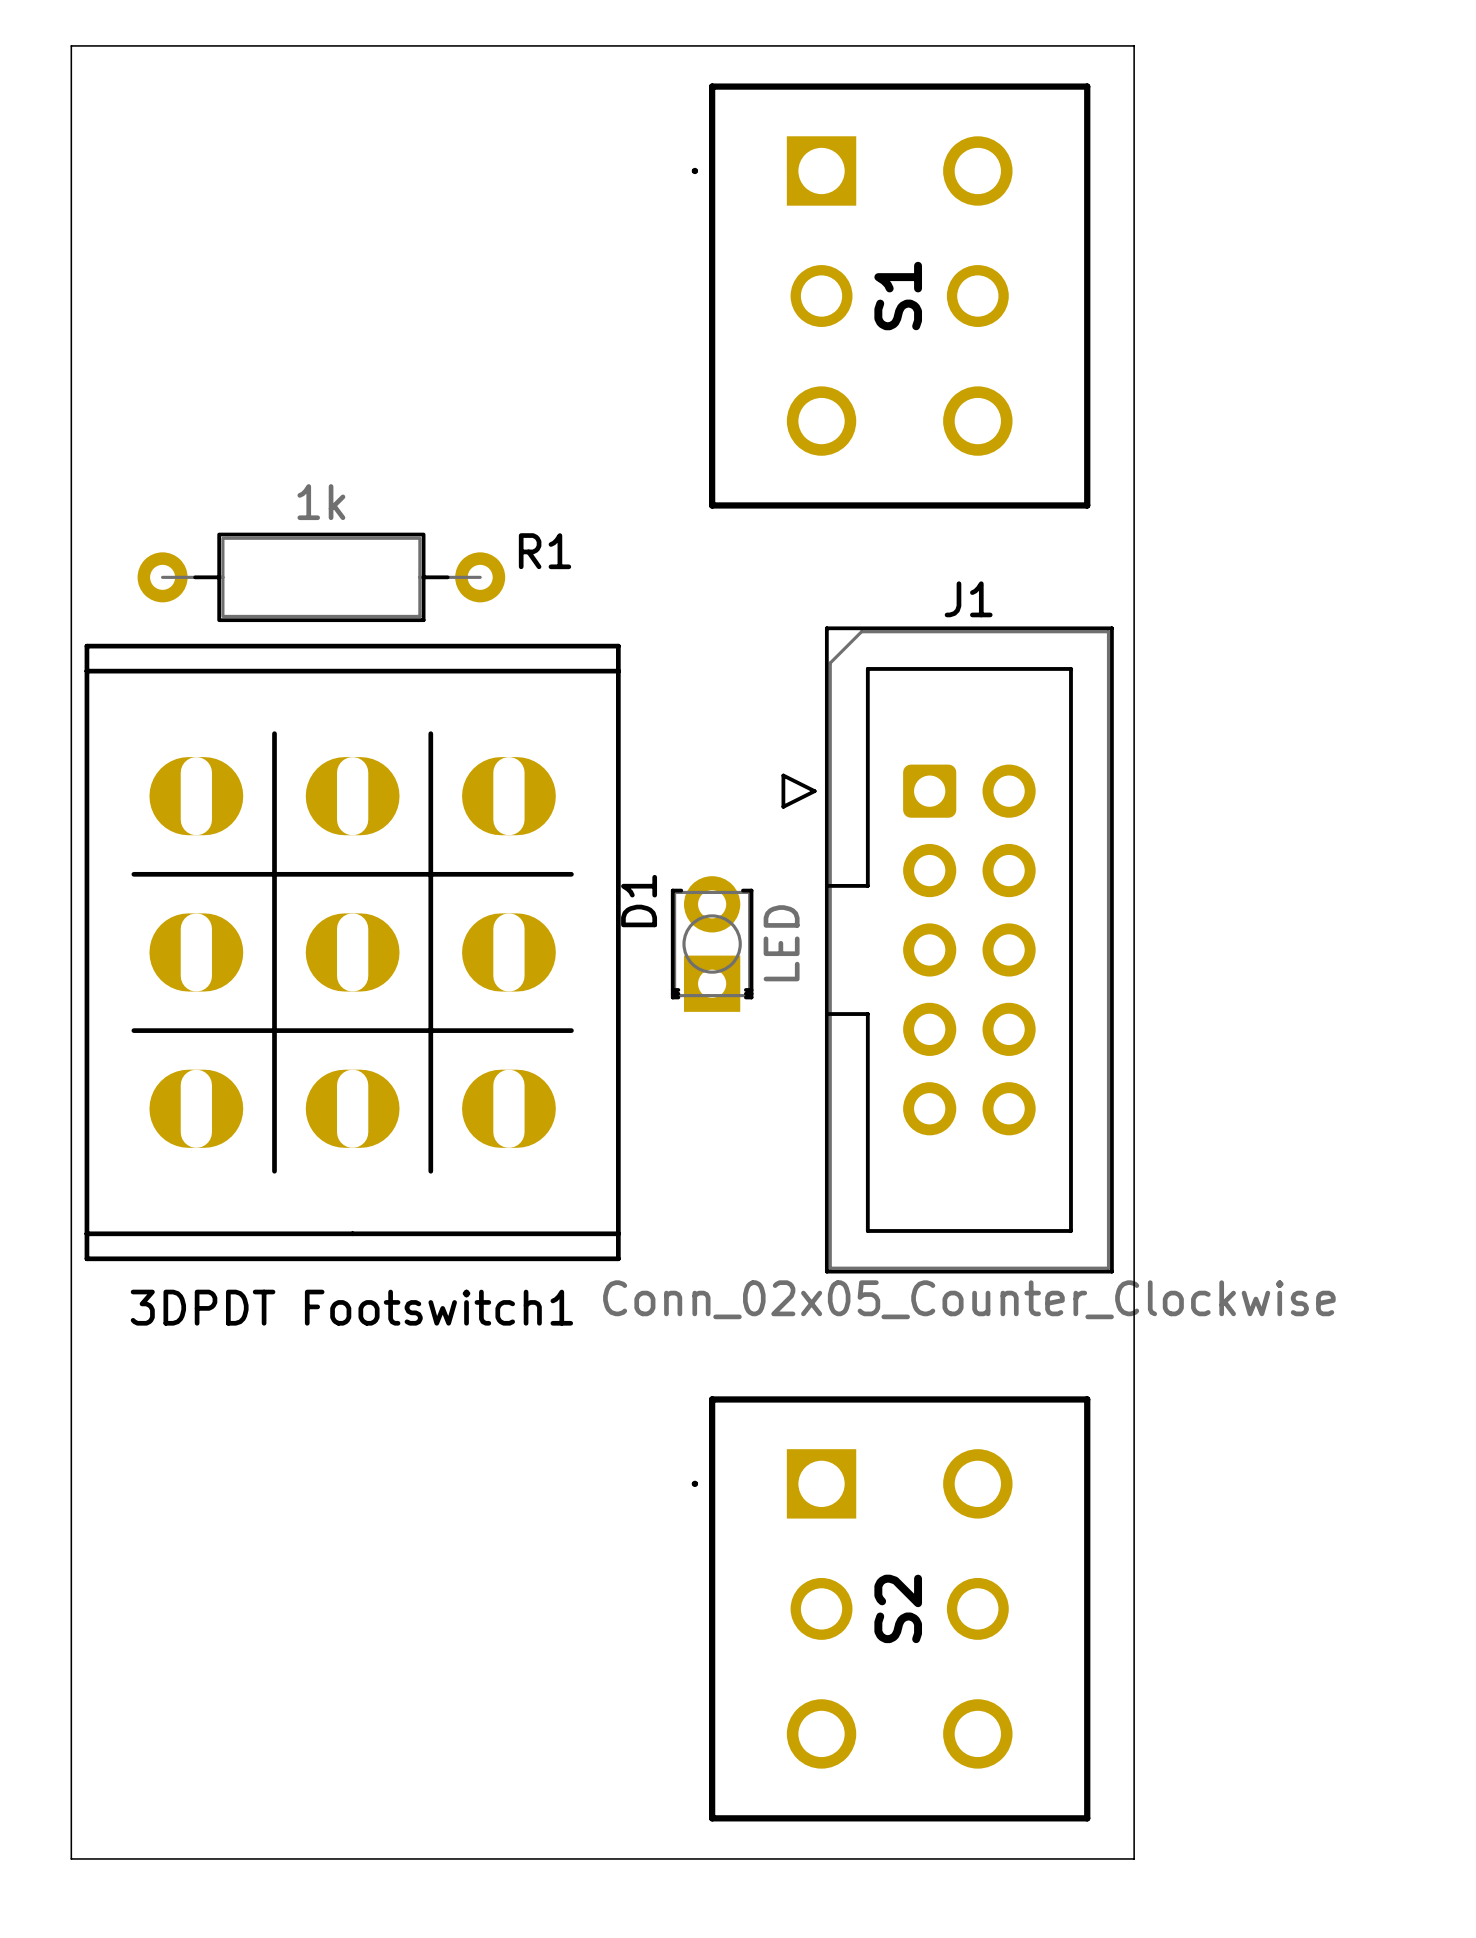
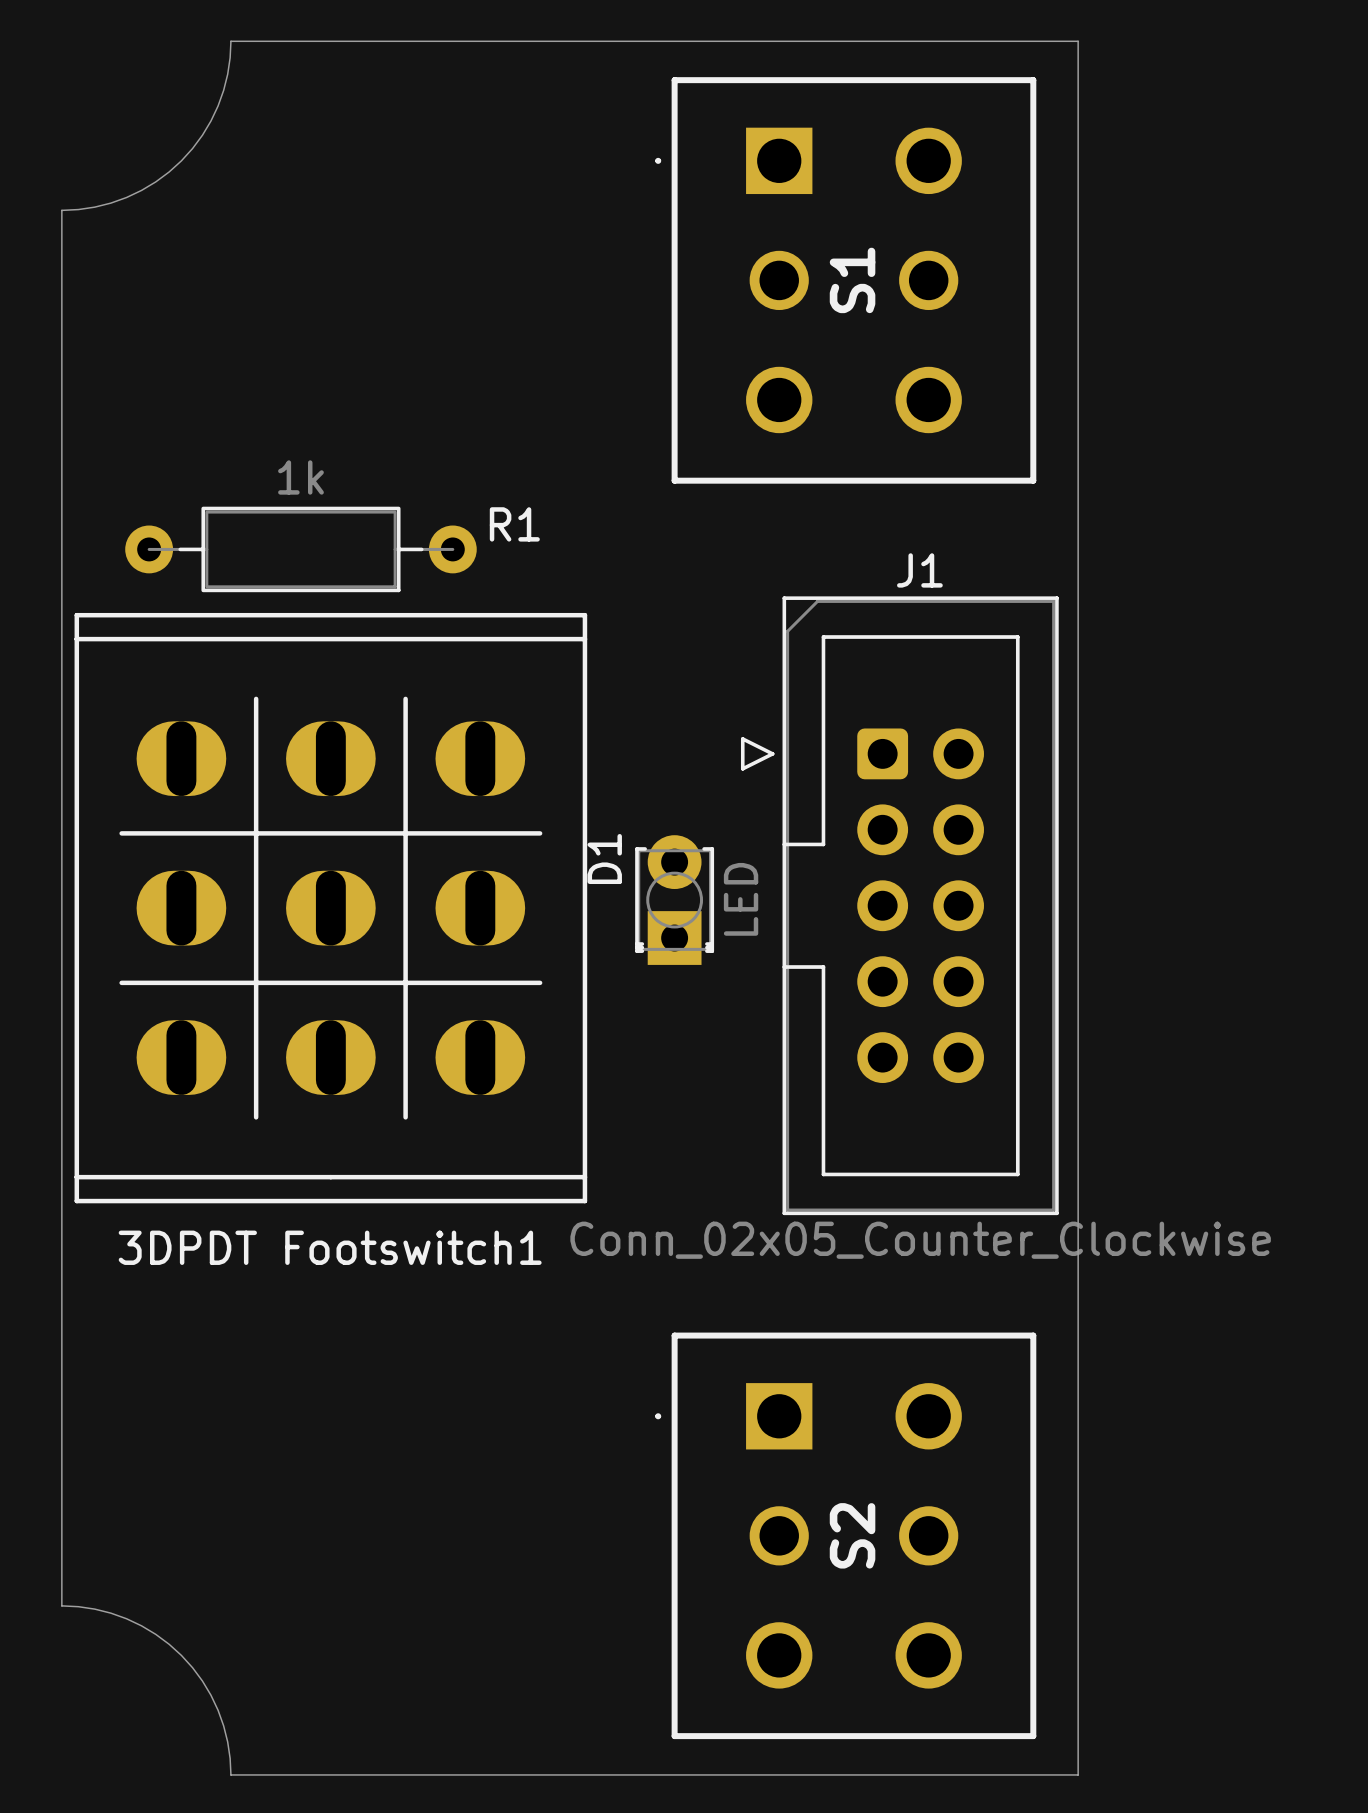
board edge: (248, 45) (71, 45) (71, 222) -> (230, 41) (227, 74) (218, 106) (202, 135) (181, 160) (155, 181) (126, 197) (94, 207) (61, 210)
board edge: (71, 1682) (71, 1858) (248, 1858) -> (61, 1605) (94, 1609) (126, 1618) (155, 1634) (181, 1655) (202, 1681) (218, 1710) (227, 1741) (230, 1774)

